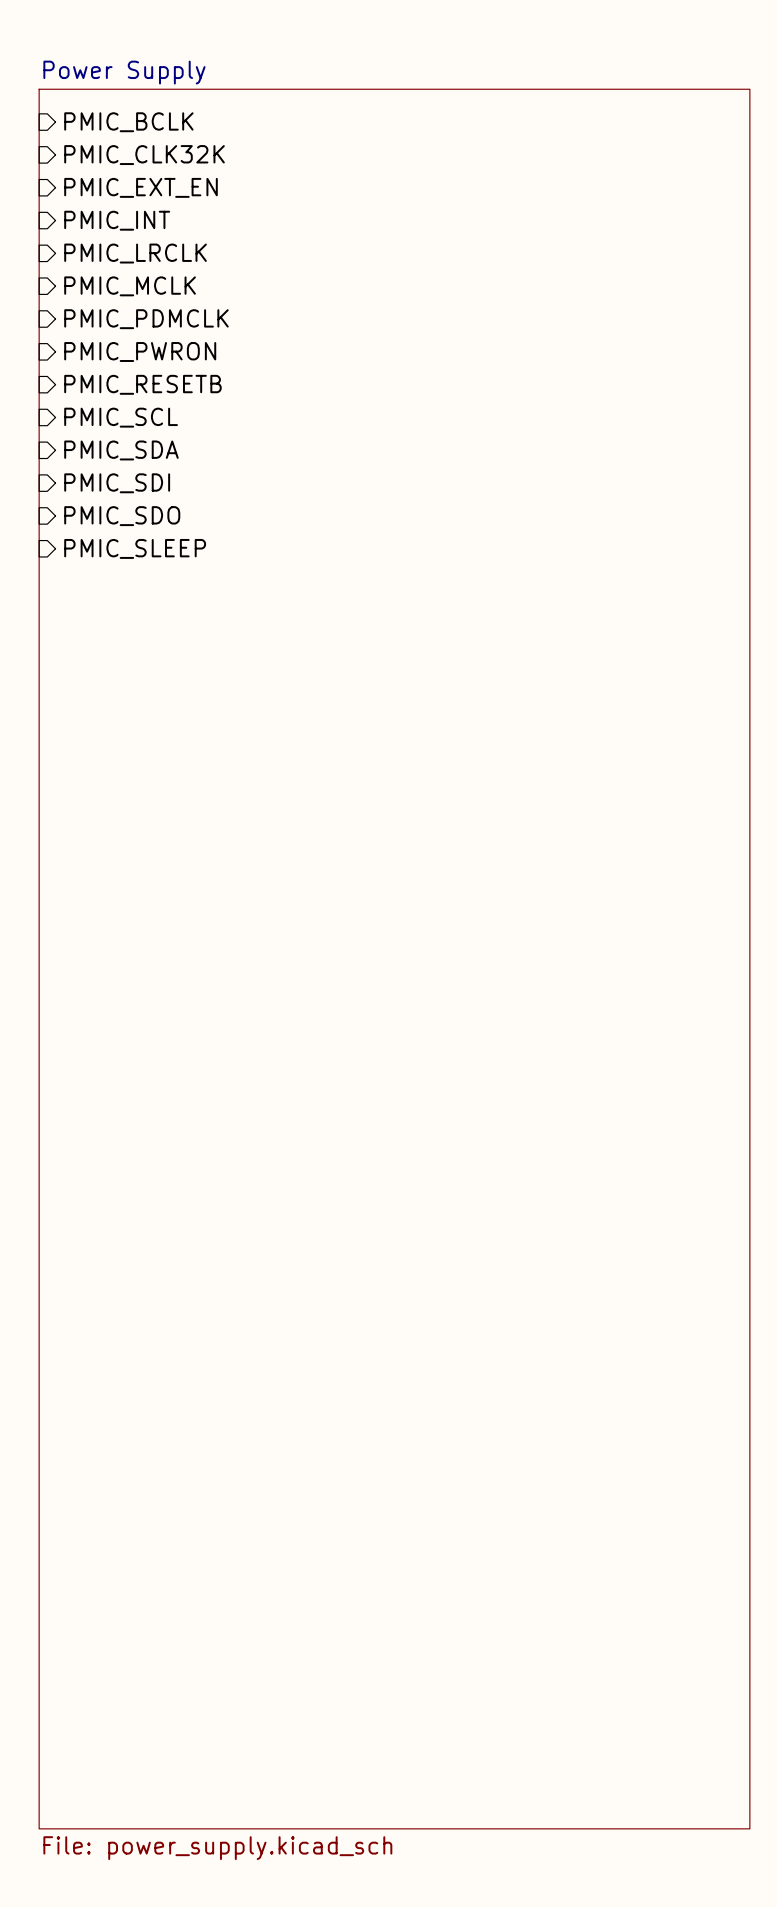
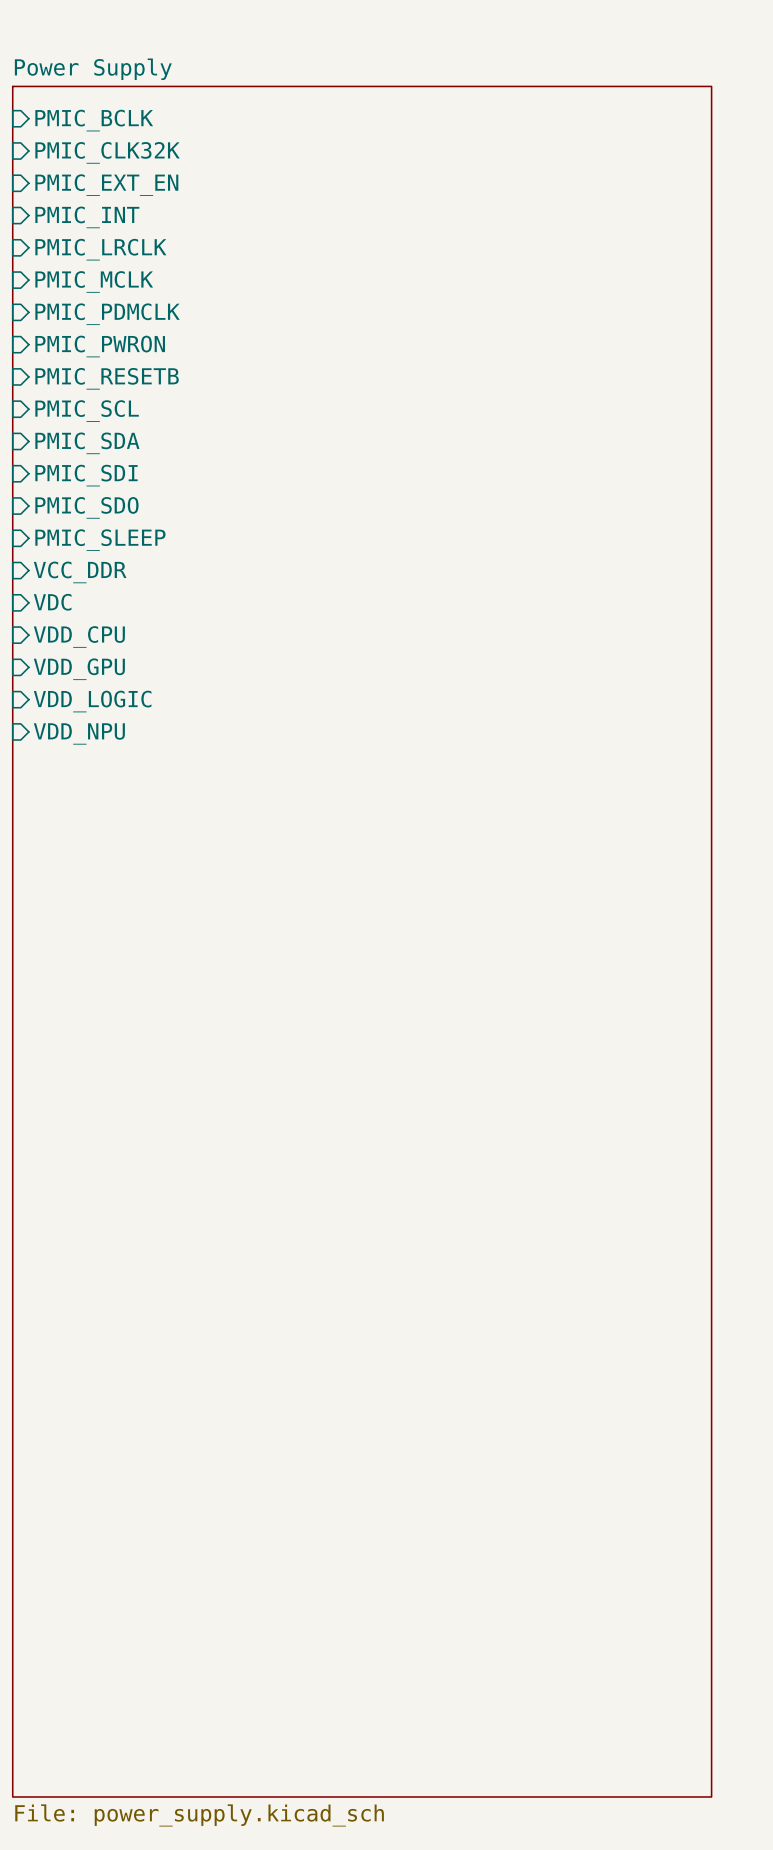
sheet pin: none -> VCC_DDR (80, 572)
sheet pin: none -> VDC (52, 602)
sheet pin: none -> VDD_CPU (79, 636)
sheet pin: none -> VDD_GPU (79, 669)
sheet pin: none -> VDD_LOGIC (92, 701)
sheet pin: none -> VDD_NPU (79, 733)

